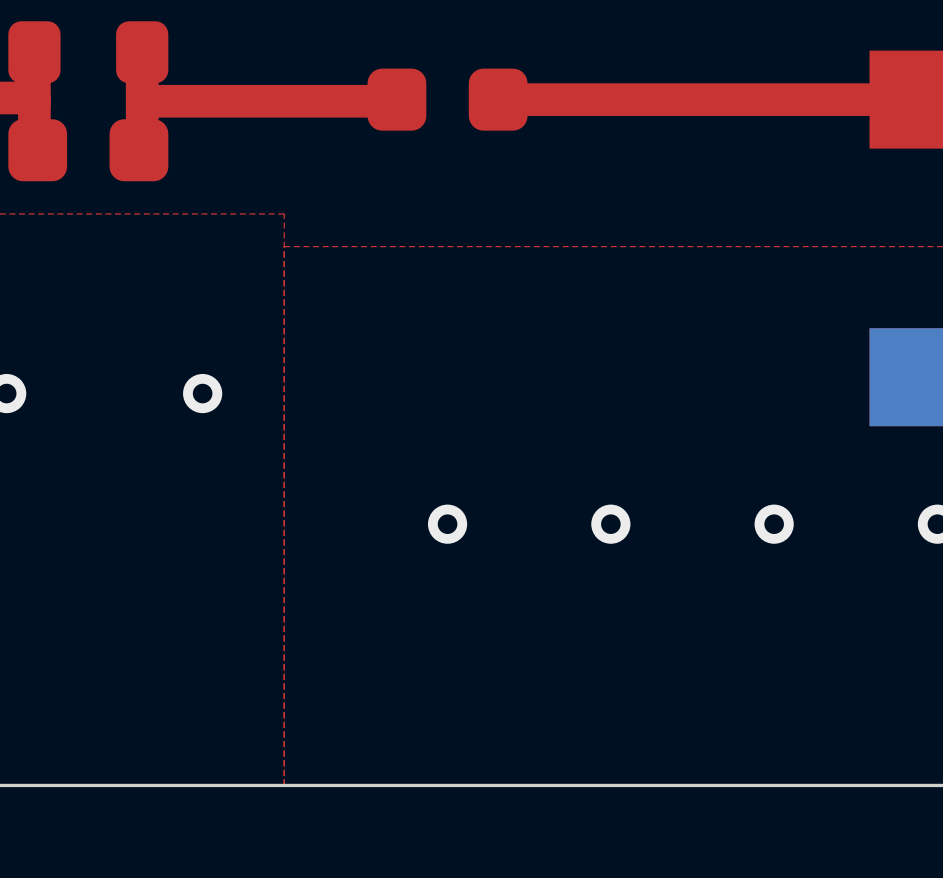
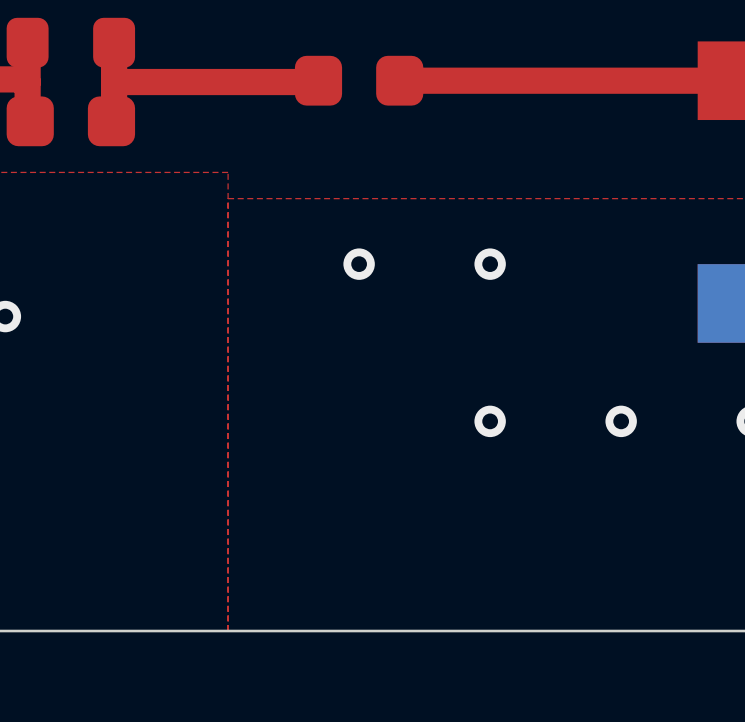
via: none -> (359, 264)
via: none -> (490, 264)
via: (202, 393) -> none
via: (447, 524) -> none

